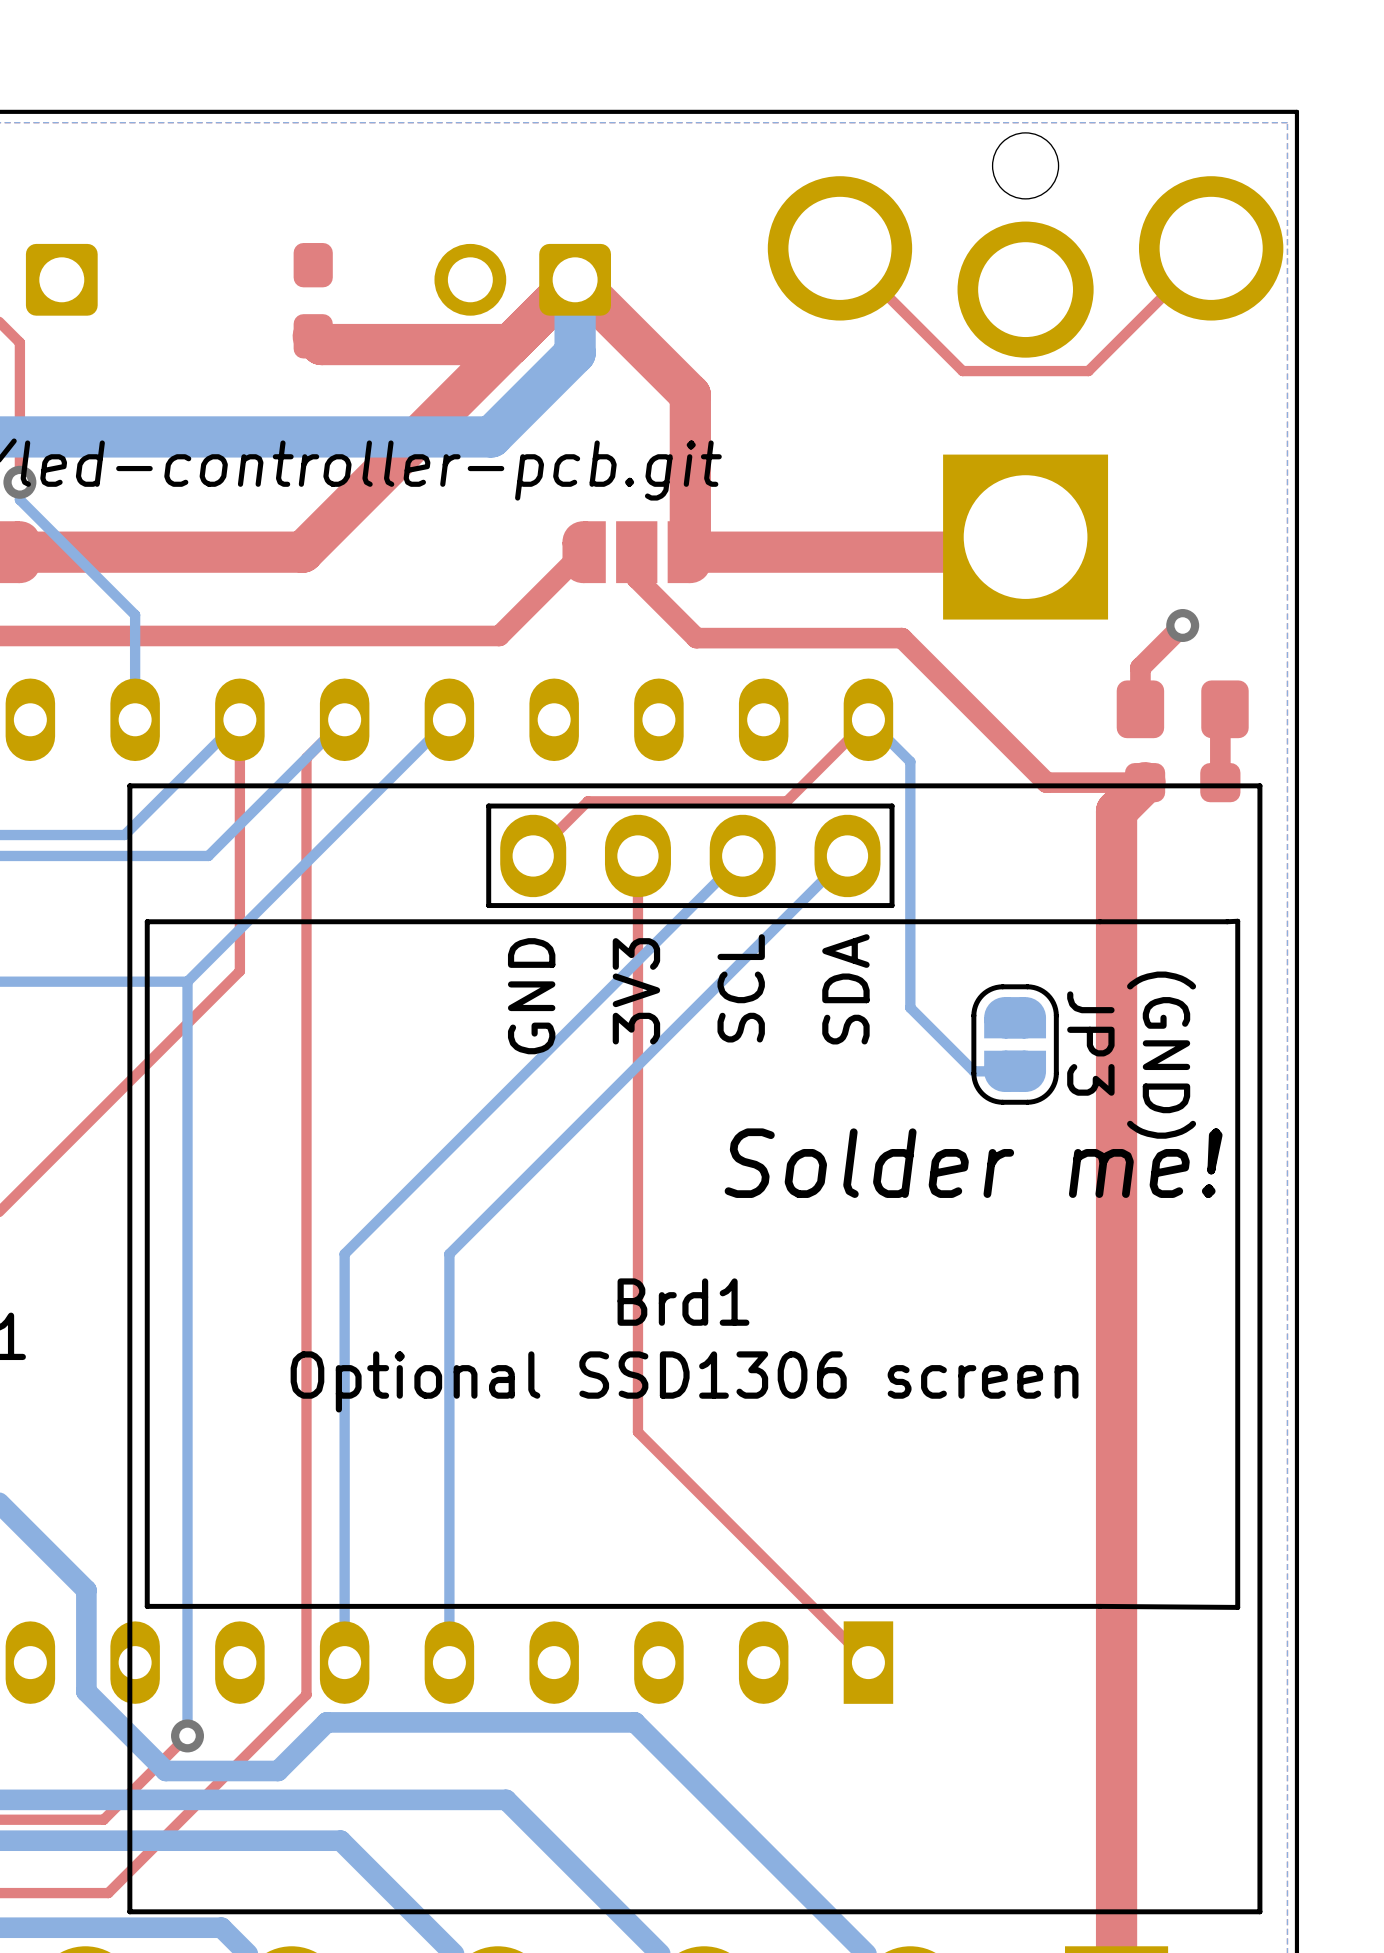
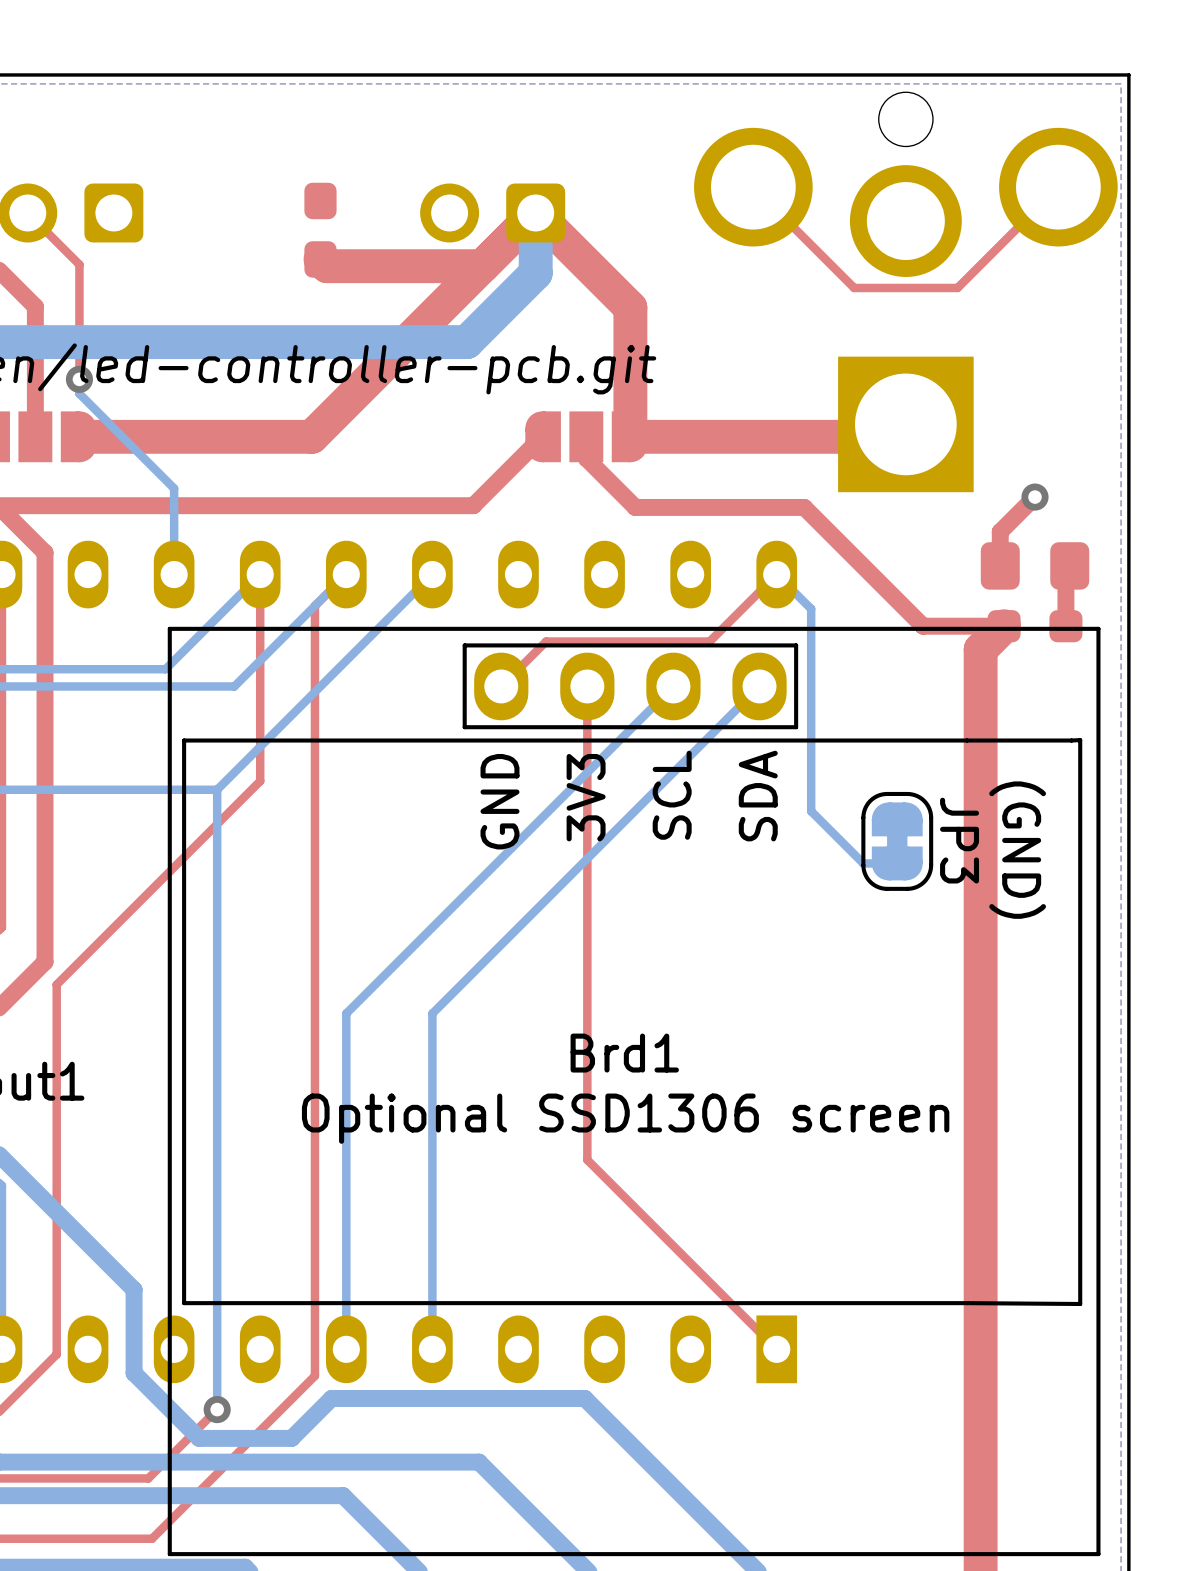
JP3 footprint: [971, 984, 1059, 1105] -> [861, 791, 934, 891]
text: Solder me! (973, 1163) -> none

